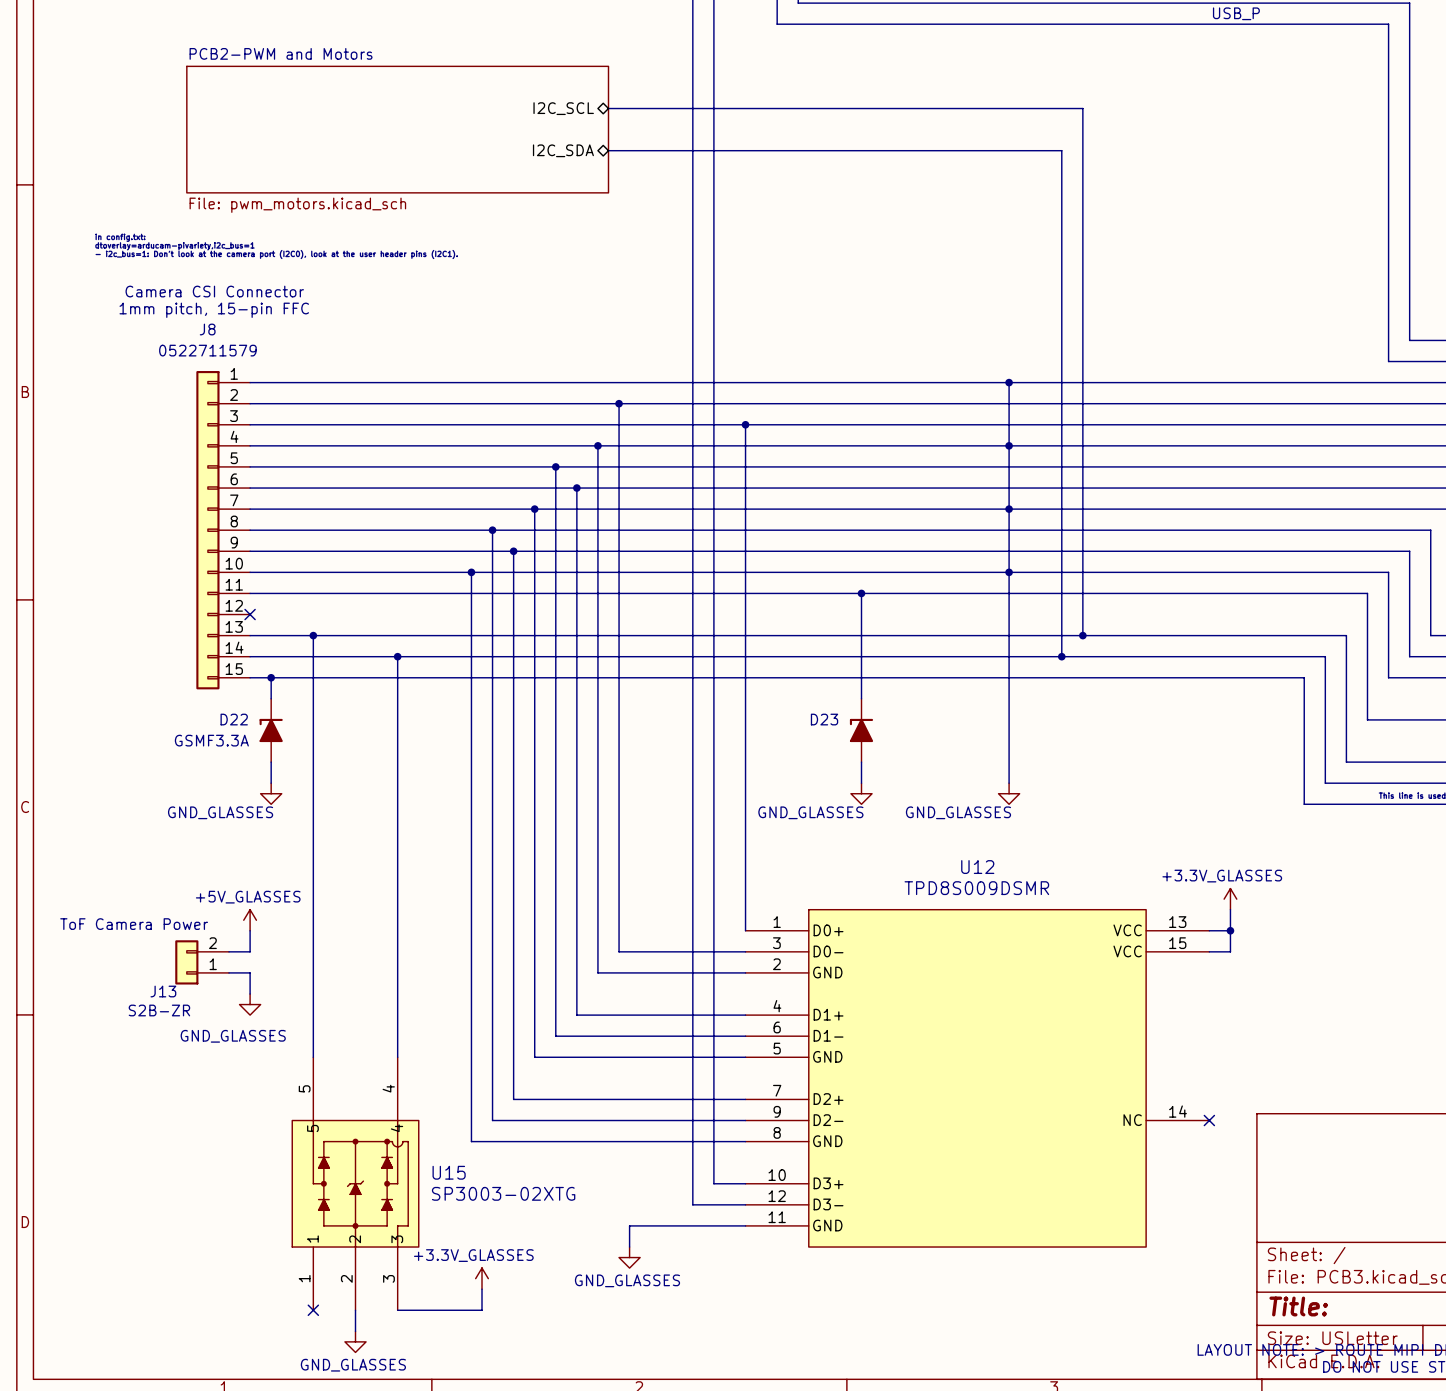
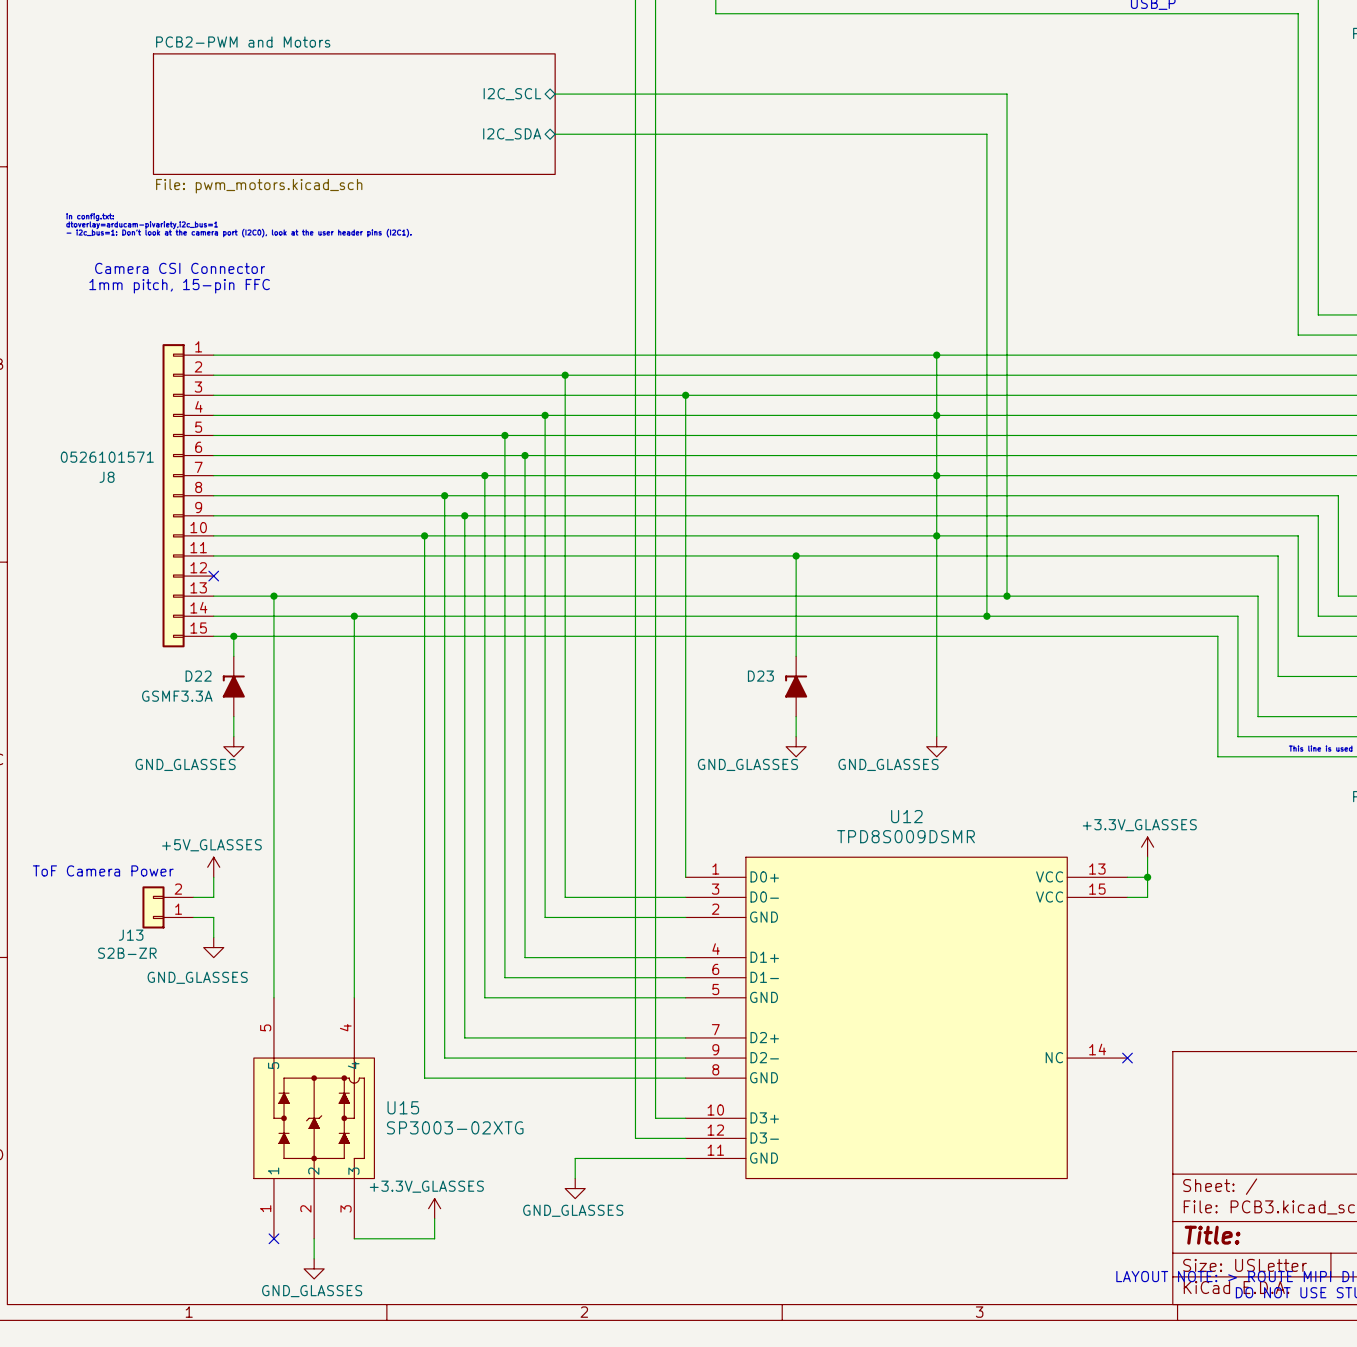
J8 name position: J8 (207, 329) -> J8 (107, 477)
J8 value: 0522711579 (207, 350) -> 0526101571 (107, 457)

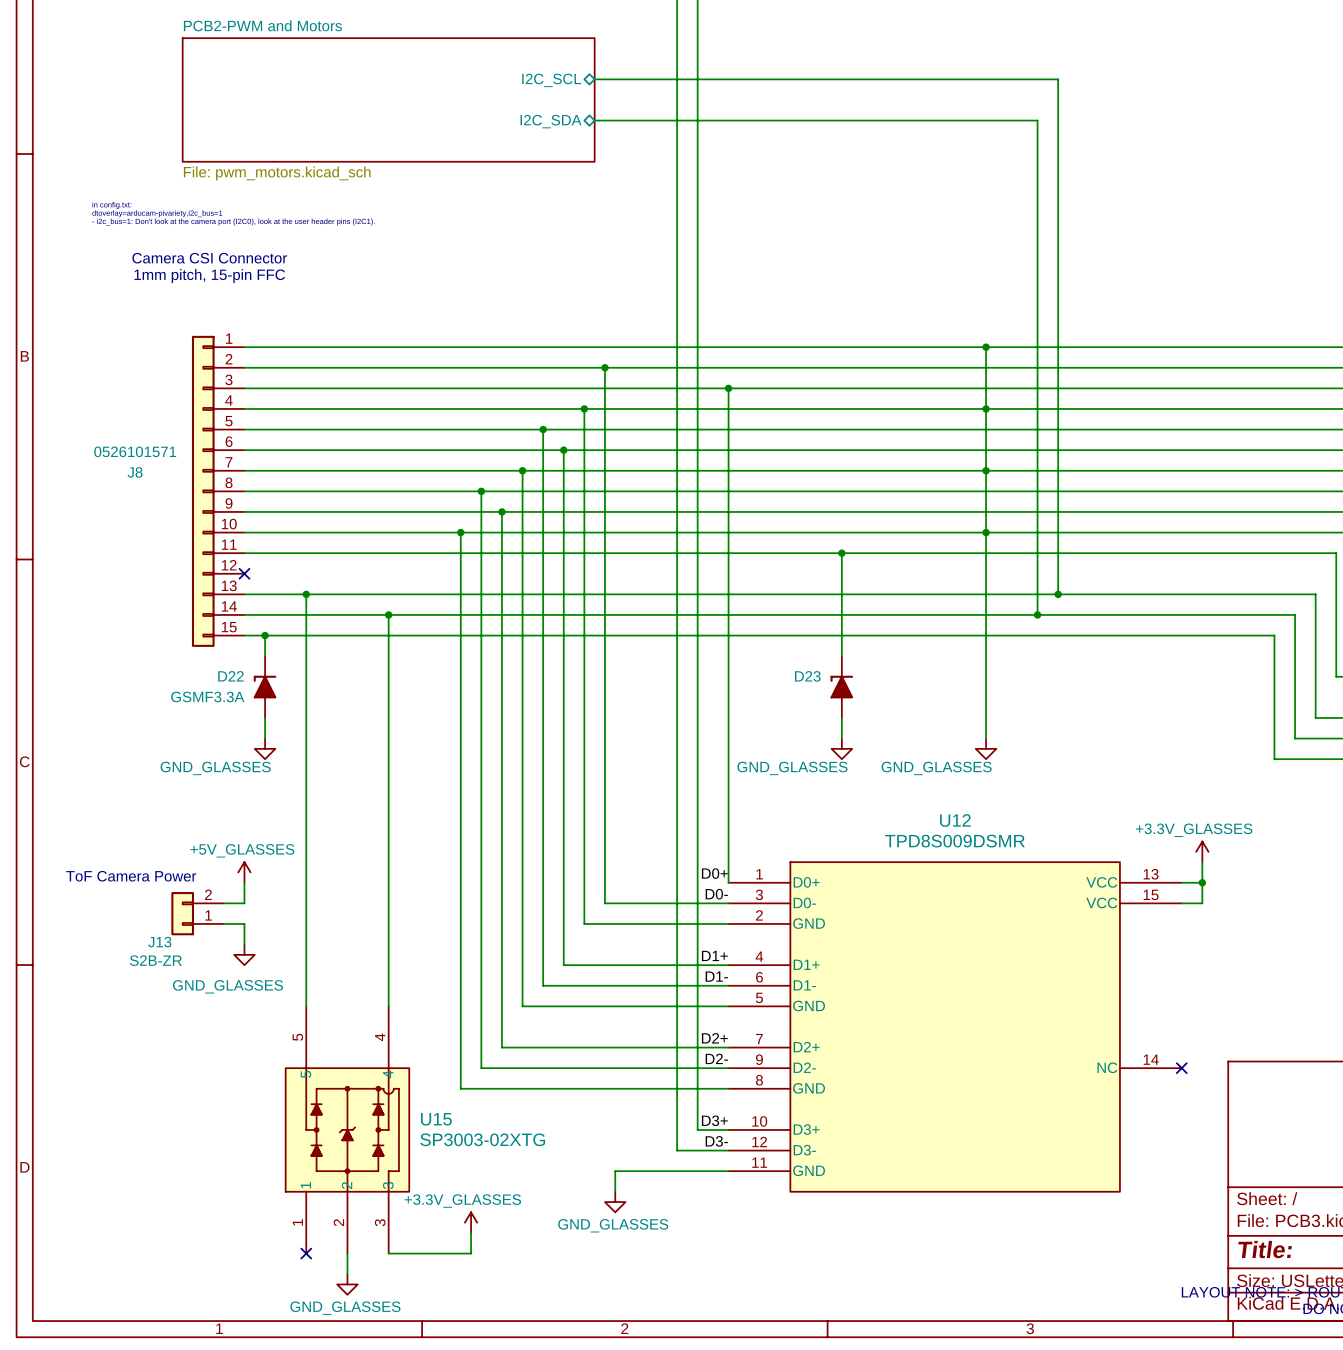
label: none -> D0+ (714, 873)
label: none -> D0- (716, 894)
label: none -> D1+ (714, 955)
label: none -> D1- (716, 976)
label: none -> D2+ (714, 1038)
label: none -> D2- (716, 1058)
label: none -> D3+ (714, 1120)
label: none -> D3- (716, 1141)

